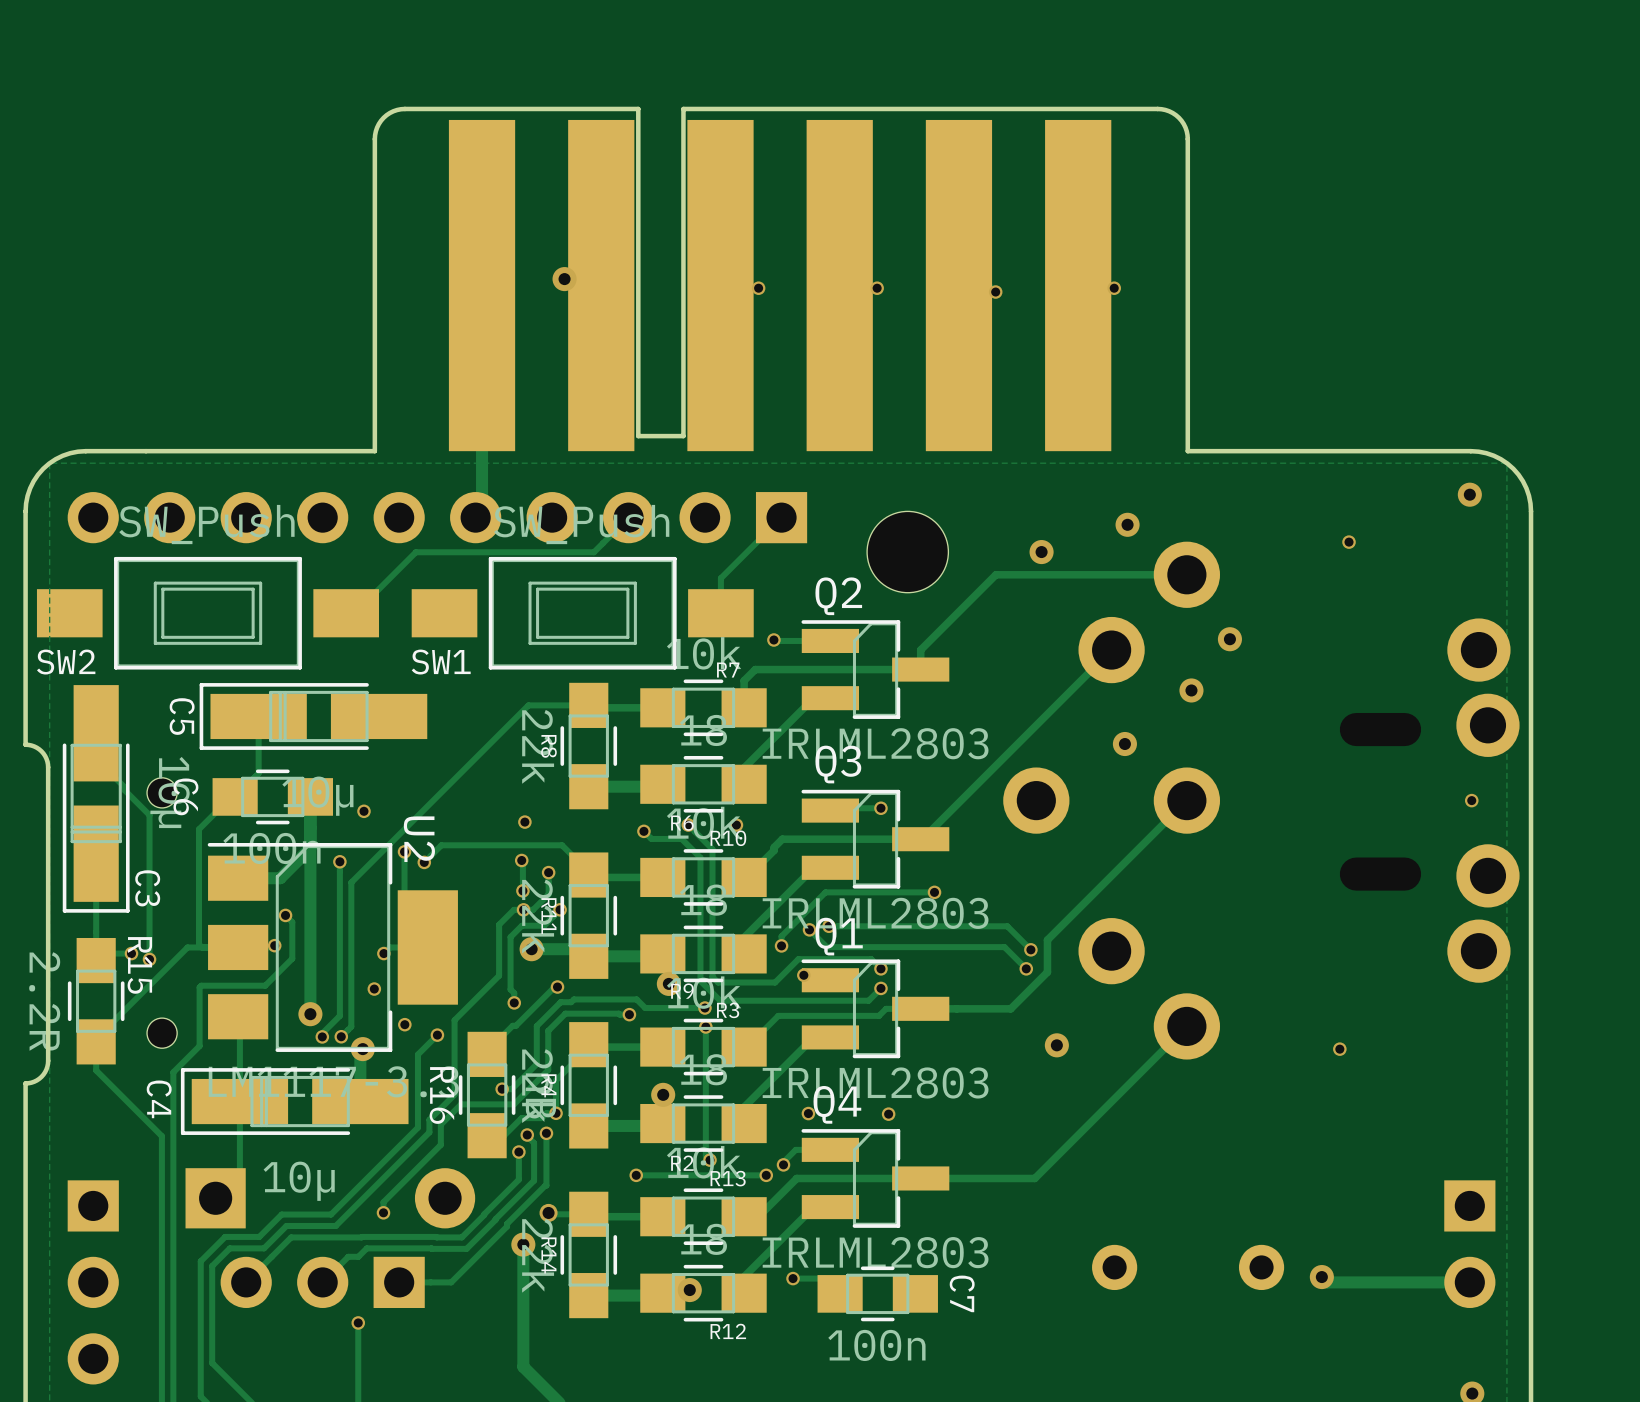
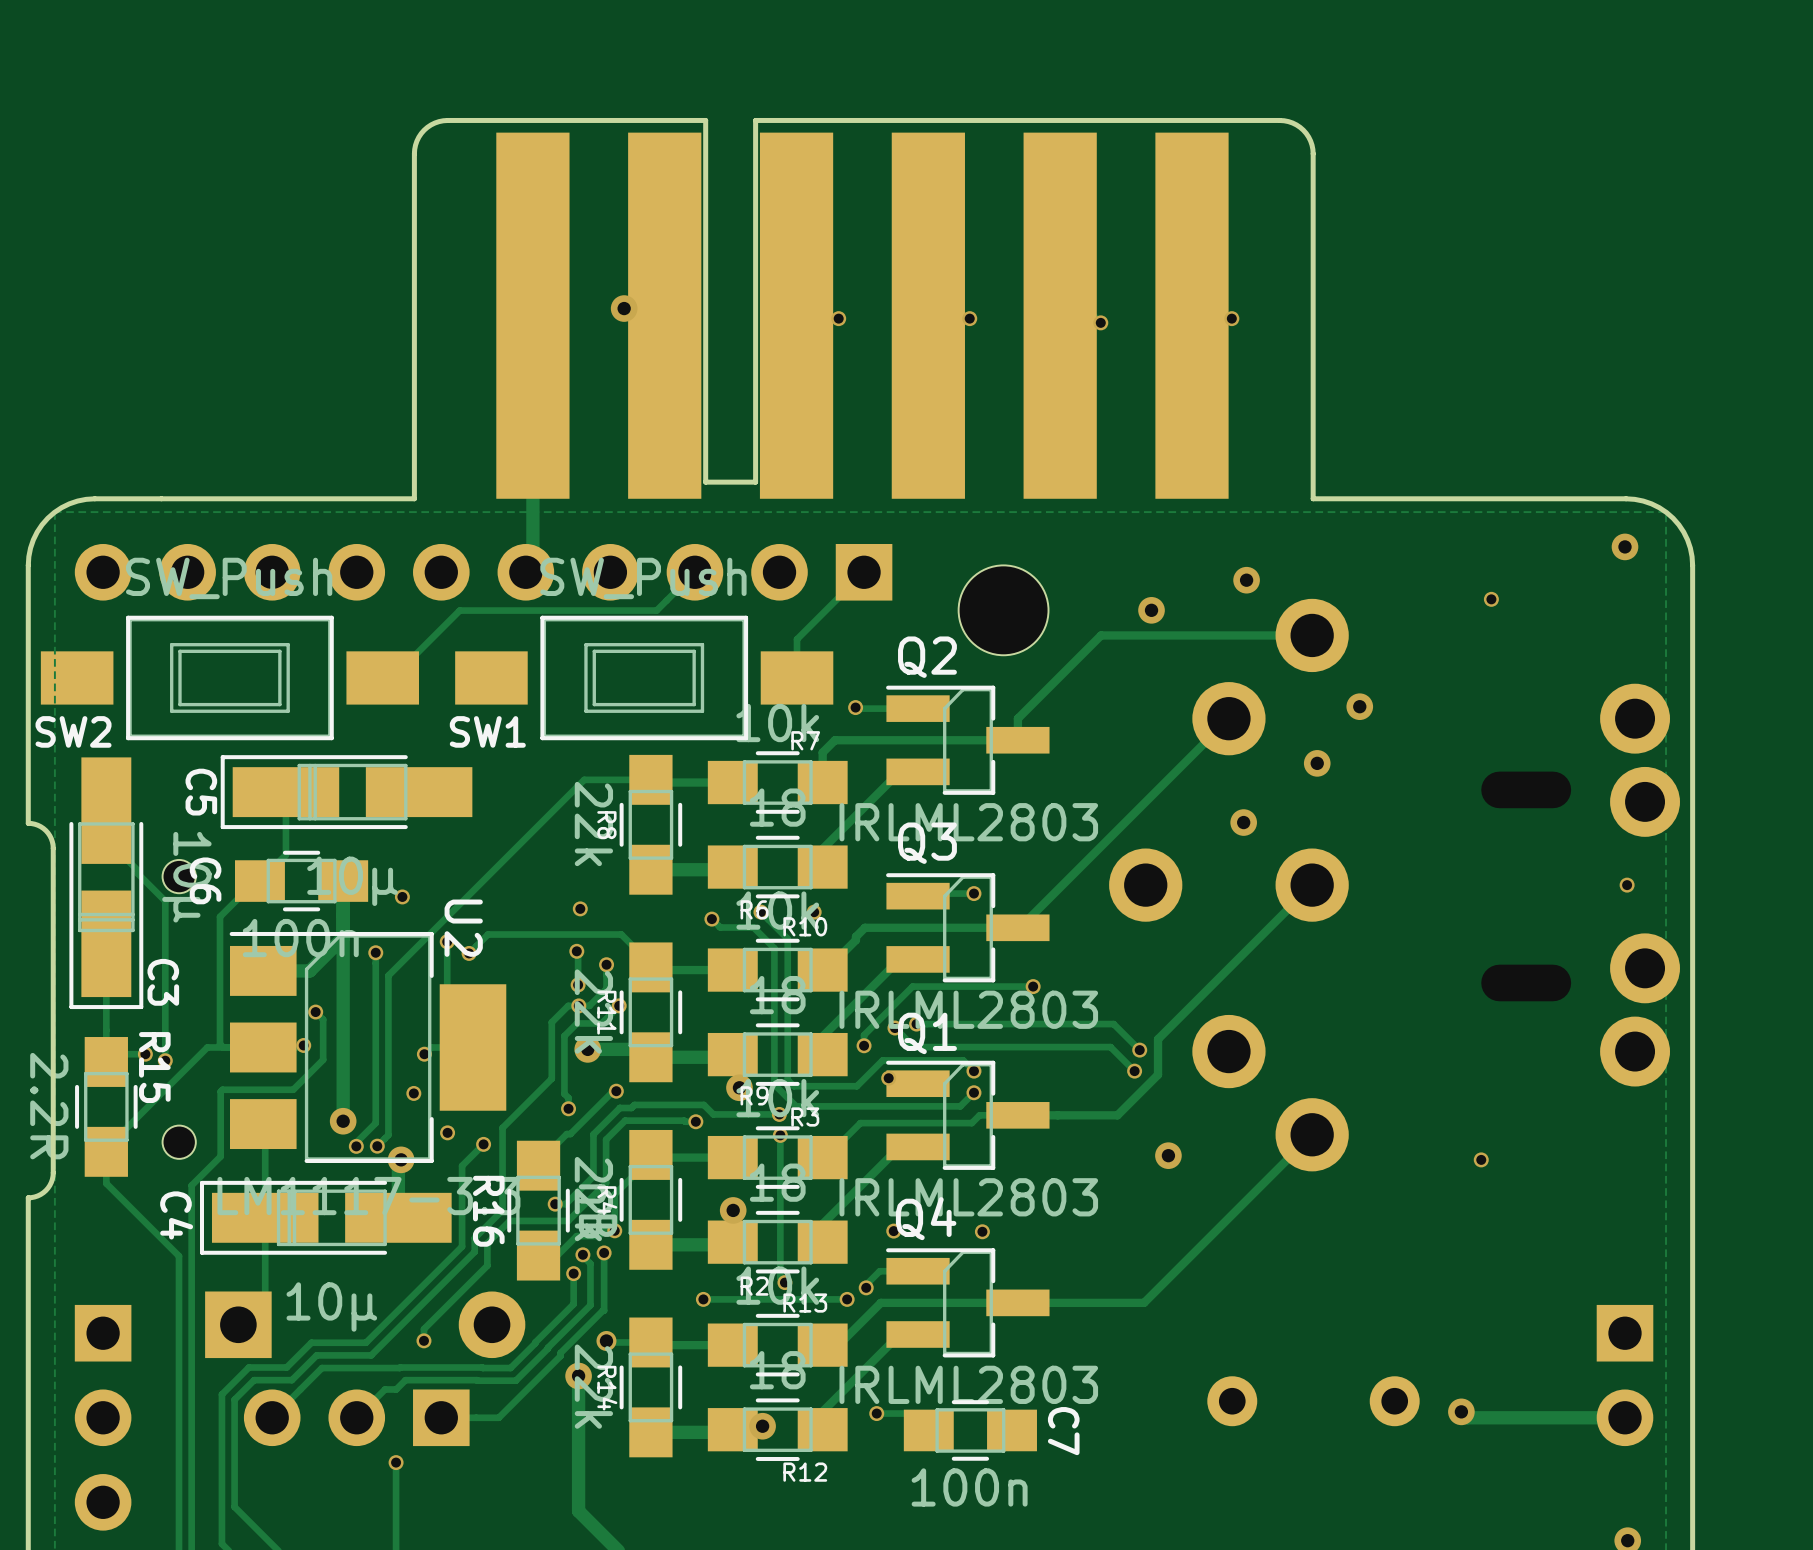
part position: (1380, 729) -> (1526, 789)
part position: (1380, 874) -> (1526, 982)

